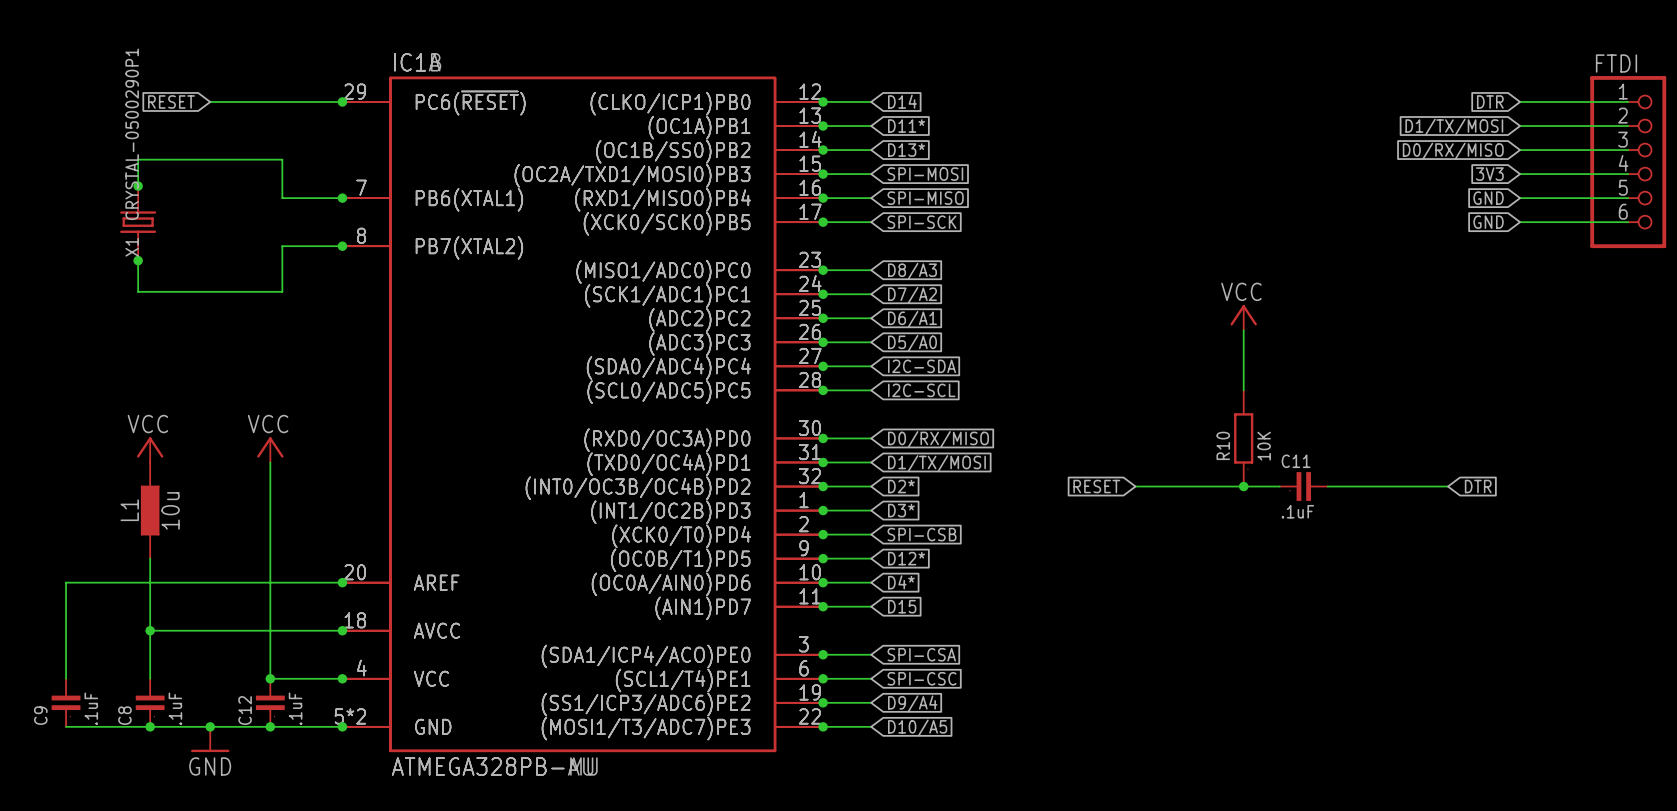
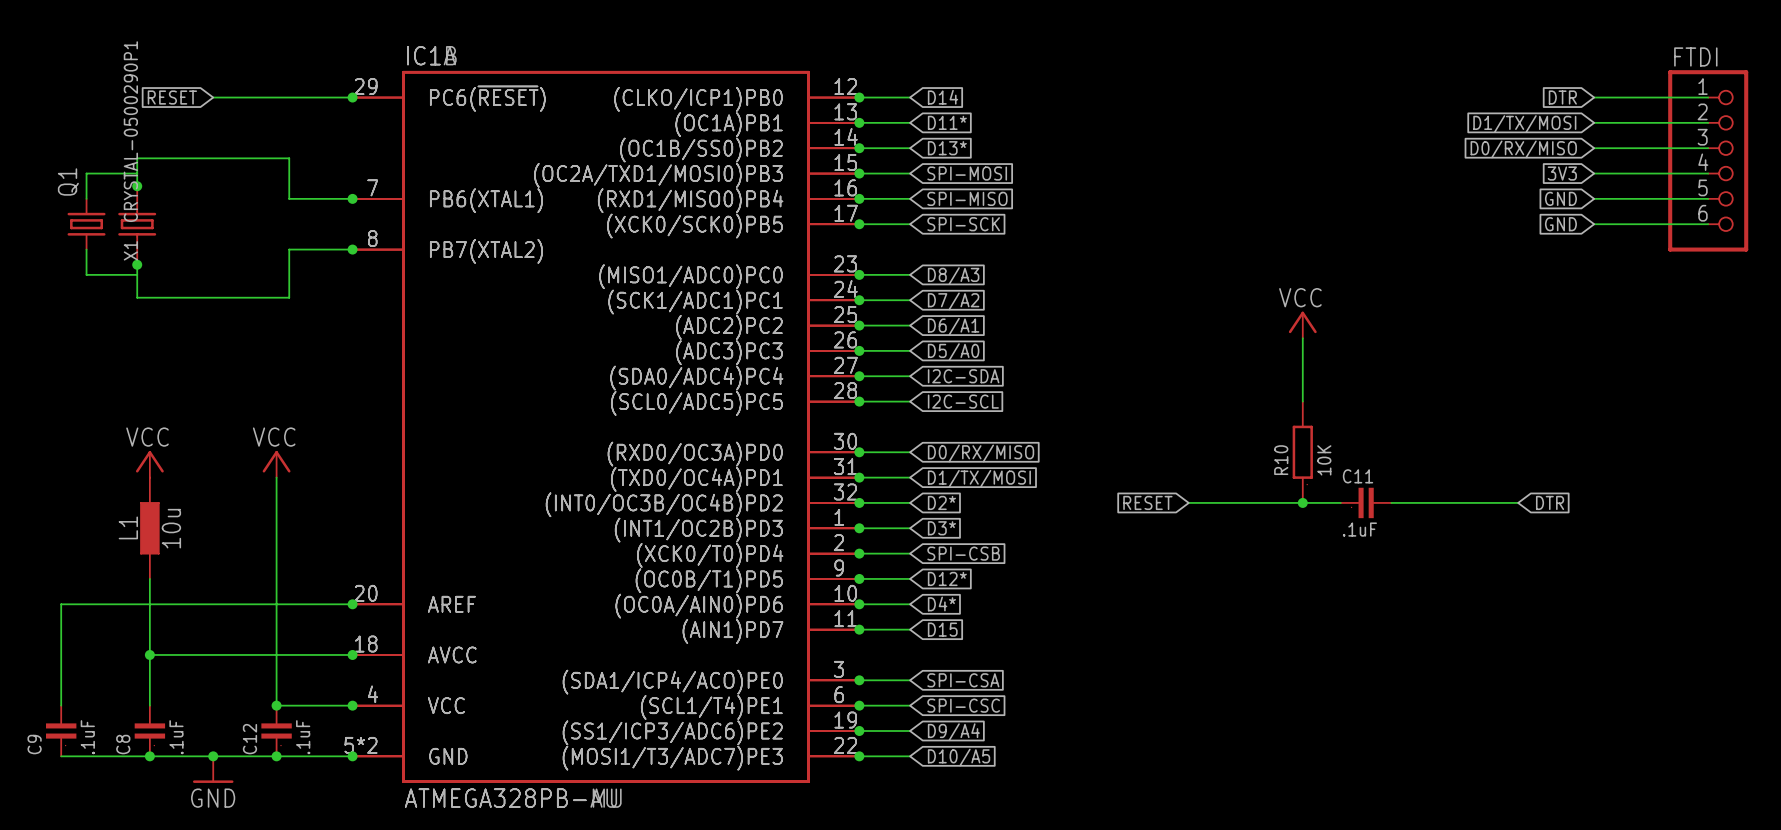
wire: none -> (137, 173) (86, 173) (86, 198)
Q1: none -> (86, 224)
wire: none -> (86, 249) (86, 274) (137, 274)

